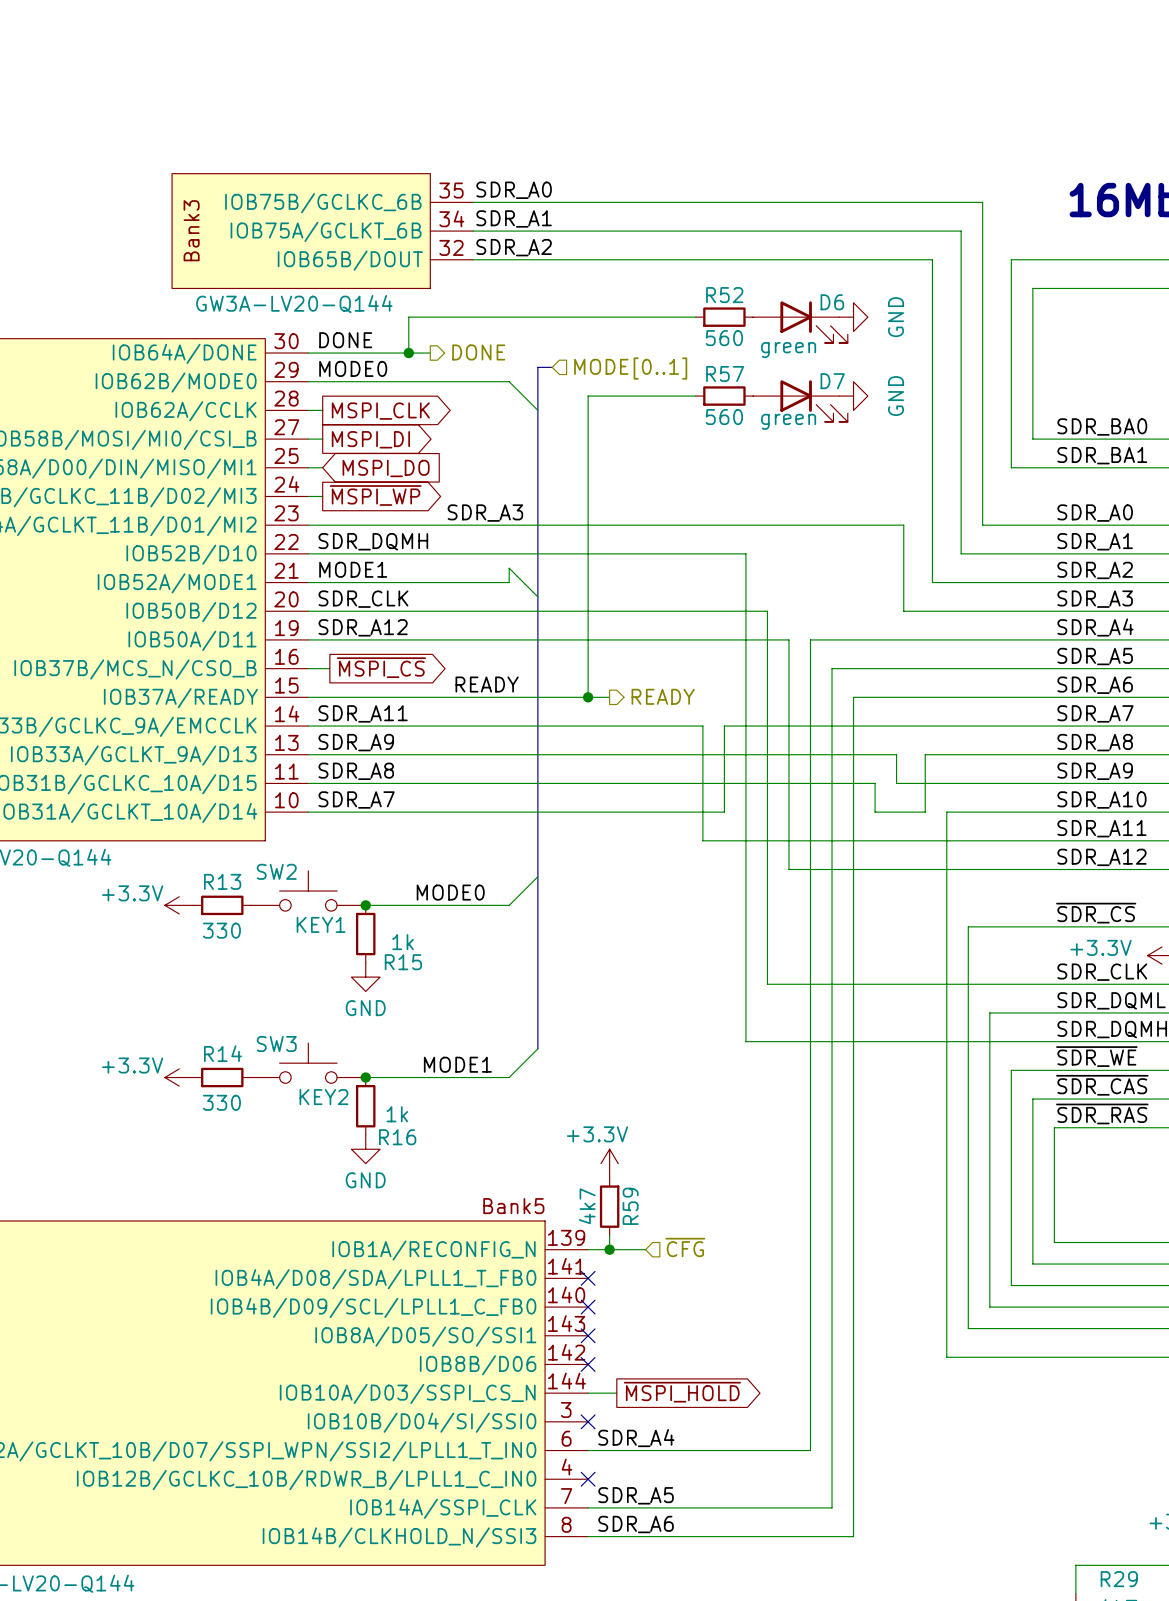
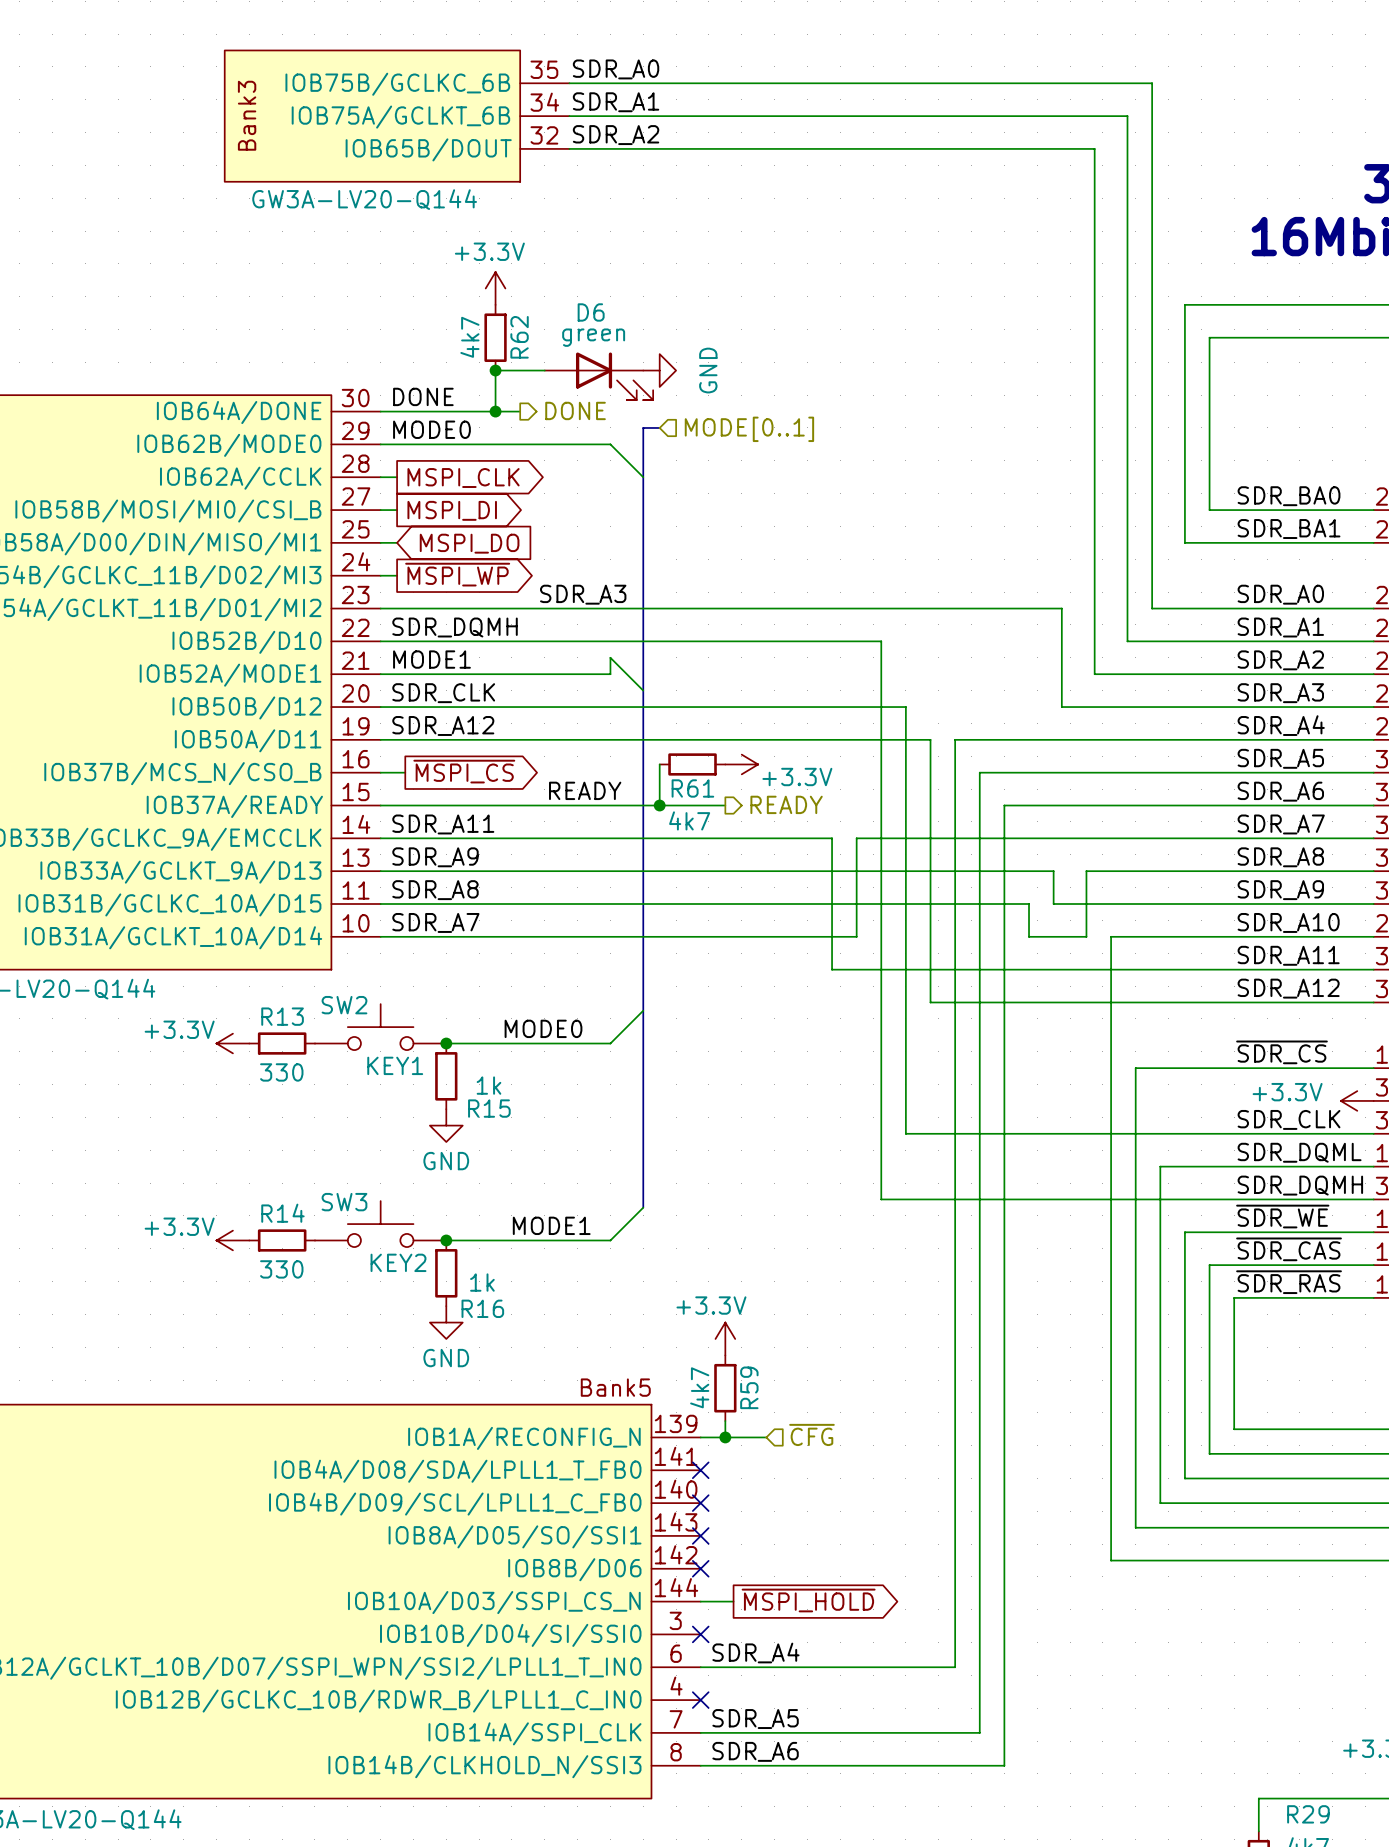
label position: SDR_A0 (514, 190) -> SDR_A0 (616, 69)
wire: (473, 202) (982, 202) -> (569, 83) (1152, 83) (1152, 239)
label position: SDR_A1 (514, 218) -> SDR_A1 (616, 102)
part position: (322, 231) -> (397, 116)
wire: (473, 231) (961, 231) -> (569, 116) (1127, 116) (1127, 272)
power symbol: none -> +3.3V (495, 288)
label position: SDR_A2 (514, 247) -> SDR_A2 (616, 135)
wire: (473, 259) (932, 259) -> (569, 148) (1094, 148) (1094, 304)
R62: none -> 4k7 (495, 337)
D6 name position: D6 (832, 302) -> D6 (591, 312)
junction: none -> (495, 370)
wire: (451, 317) (695, 317) -> none
power symbol: none -> GND (659, 370)
R52: 560 (724, 317) -> none
power symbol: GND (853, 317) -> none
D6 position: (800, 322) -> (598, 376)
D6 value position: green (788, 350) -> green (593, 337)
wire: (695, 396) (588, 396) (588, 697) -> none
R57: 560 (724, 396) -> none
power symbol: GND (853, 396) -> none
D7: green (800, 401) -> none
wire: none -> (659, 764) (659, 805)
R61: none -> 4k7 (692, 764)
power symbol: none -> +3.3V (741, 764)
junction position: (588, 697) -> (659, 805)

